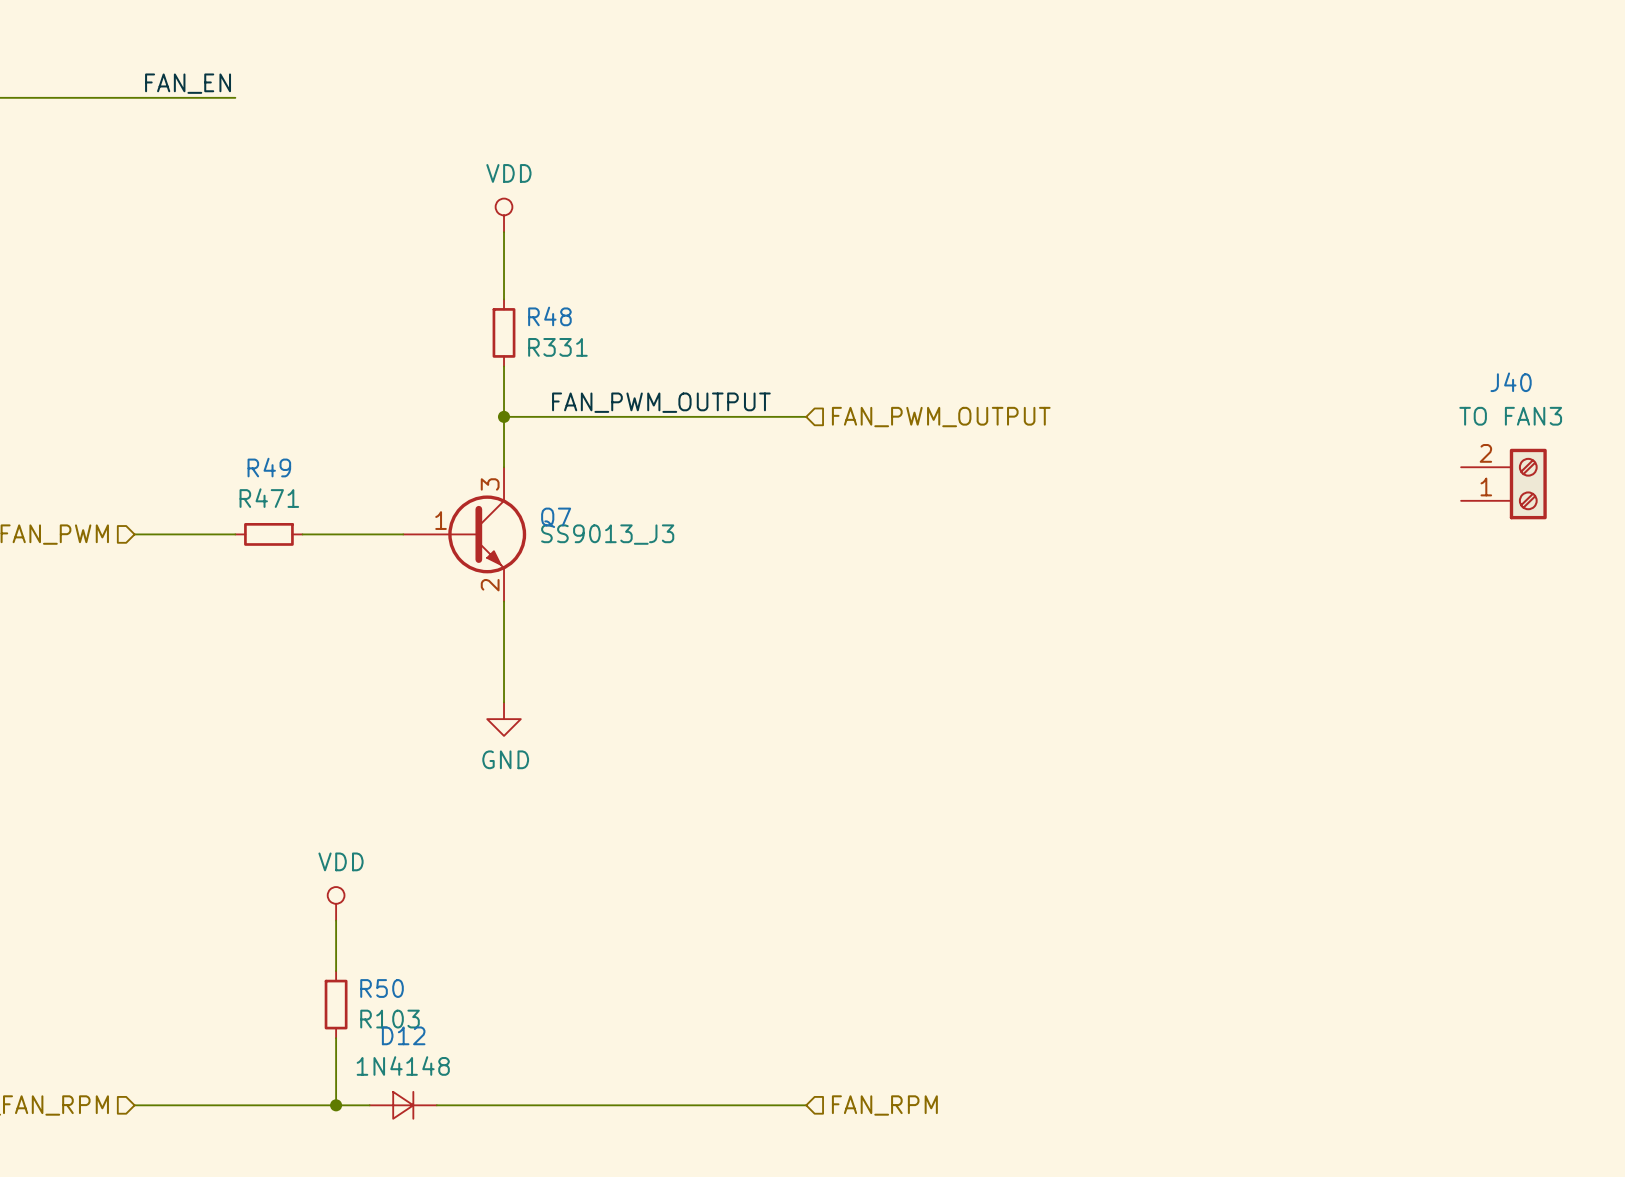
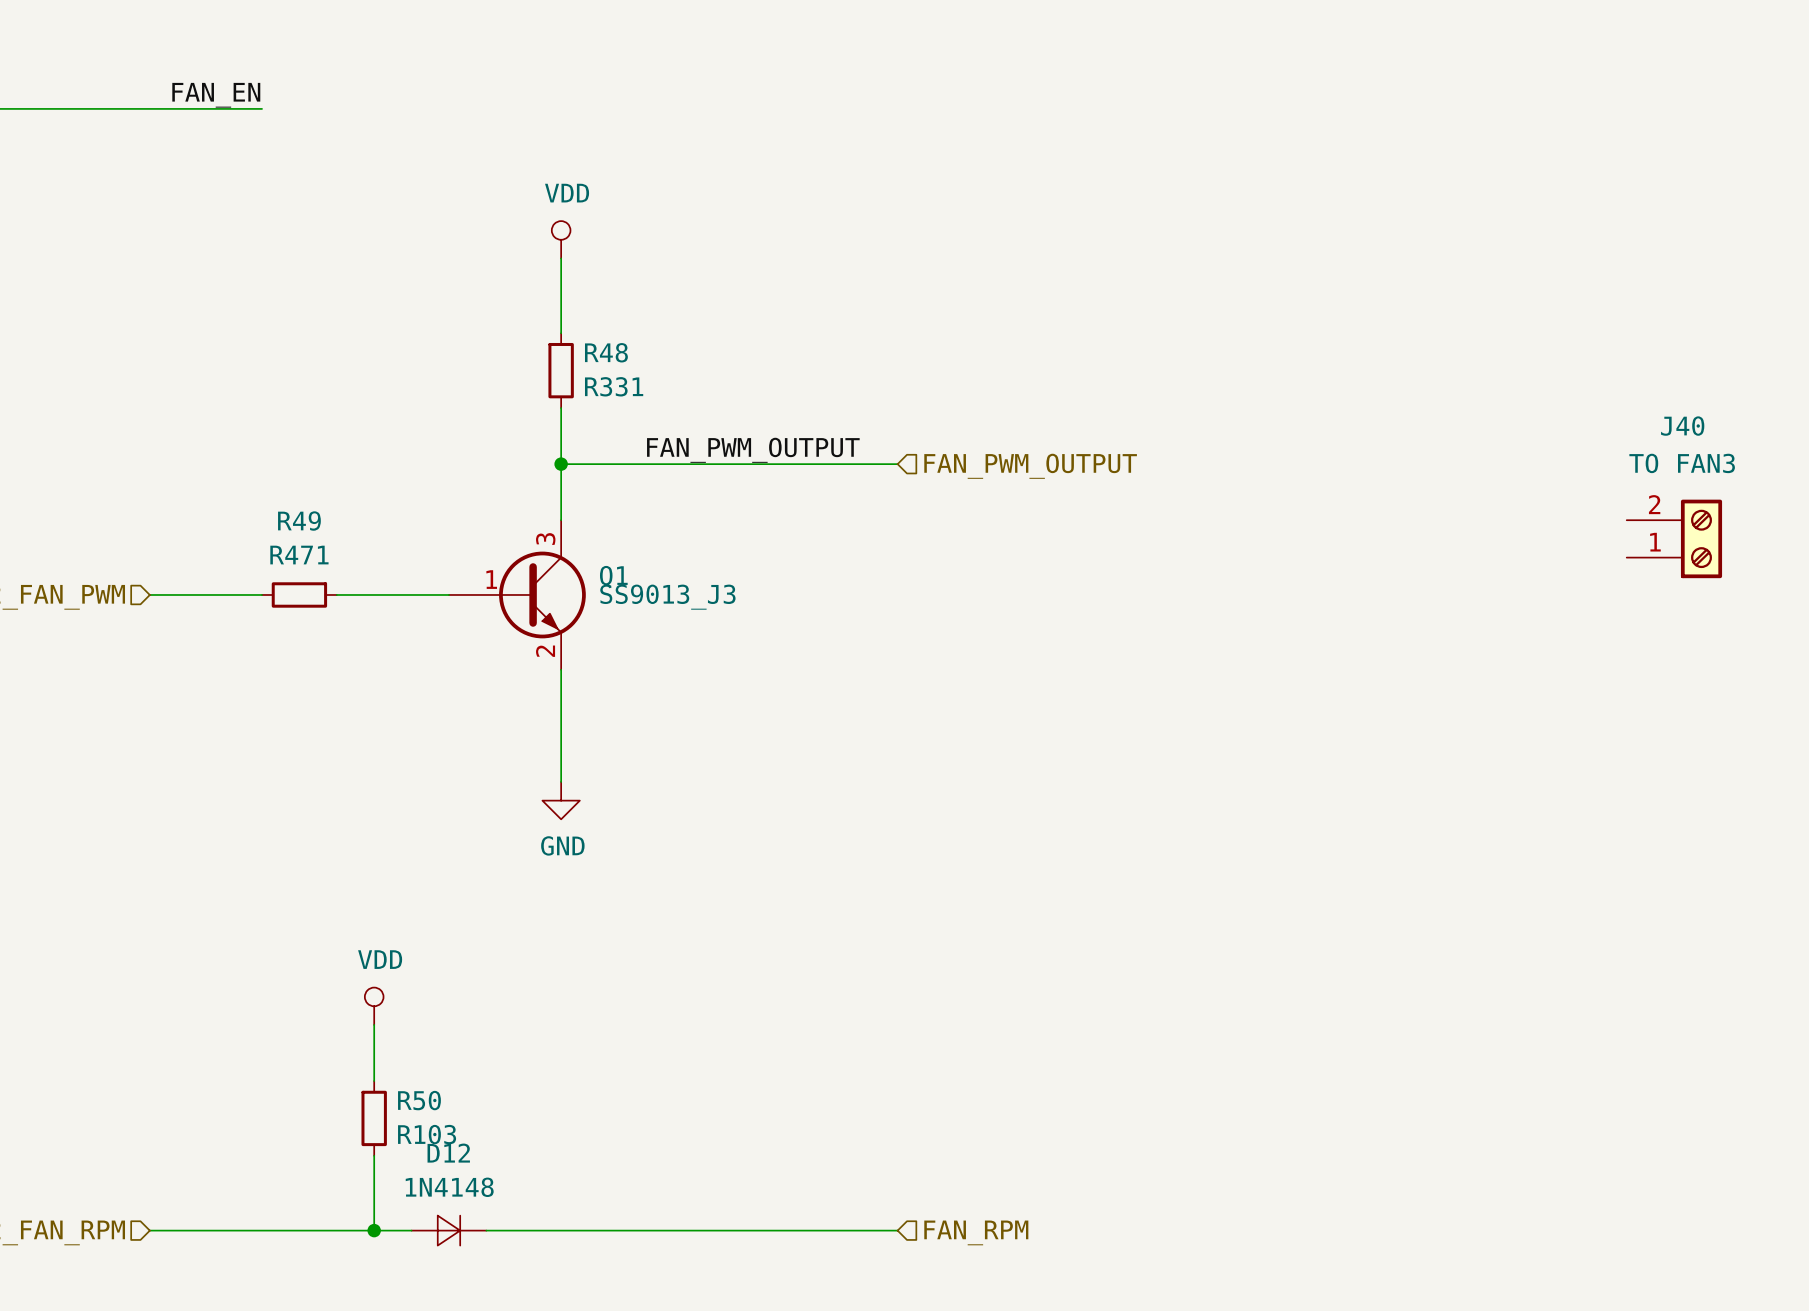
Q7 name: Q7 (556, 517) -> Q1 (613, 577)

